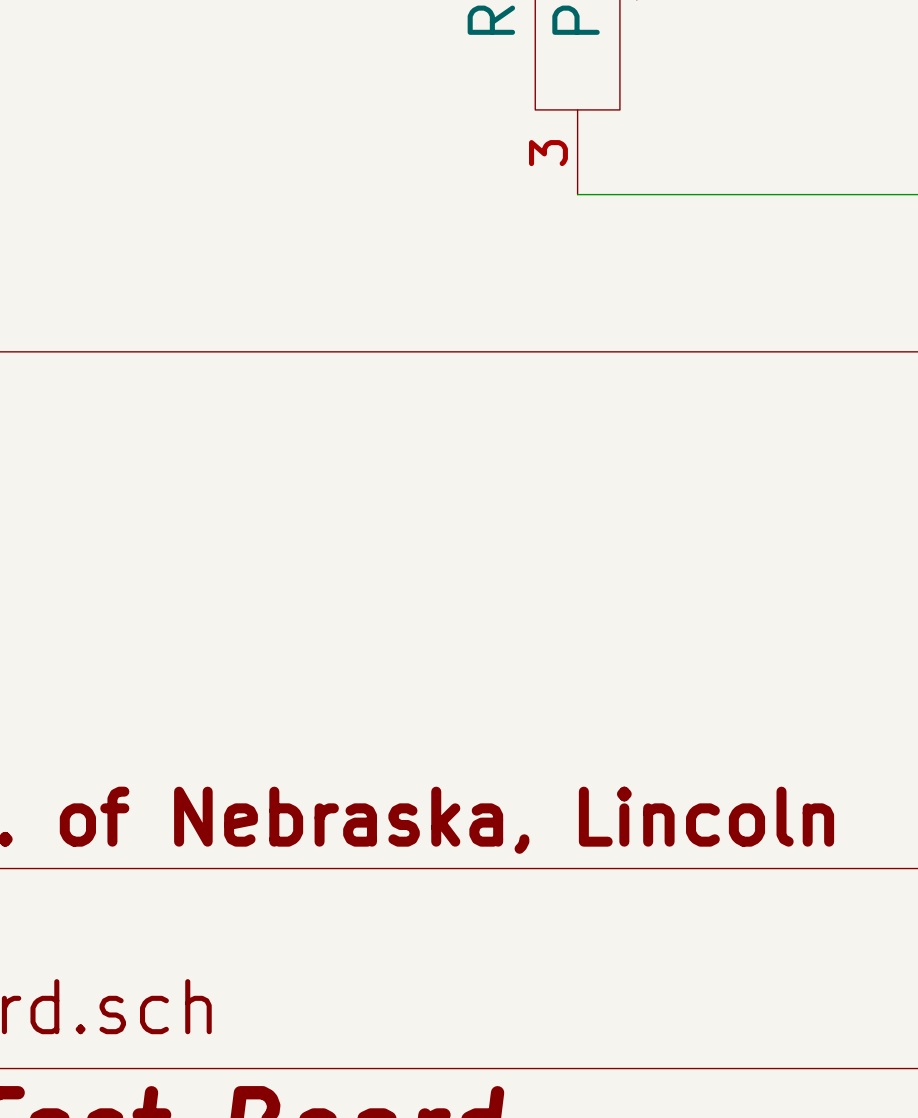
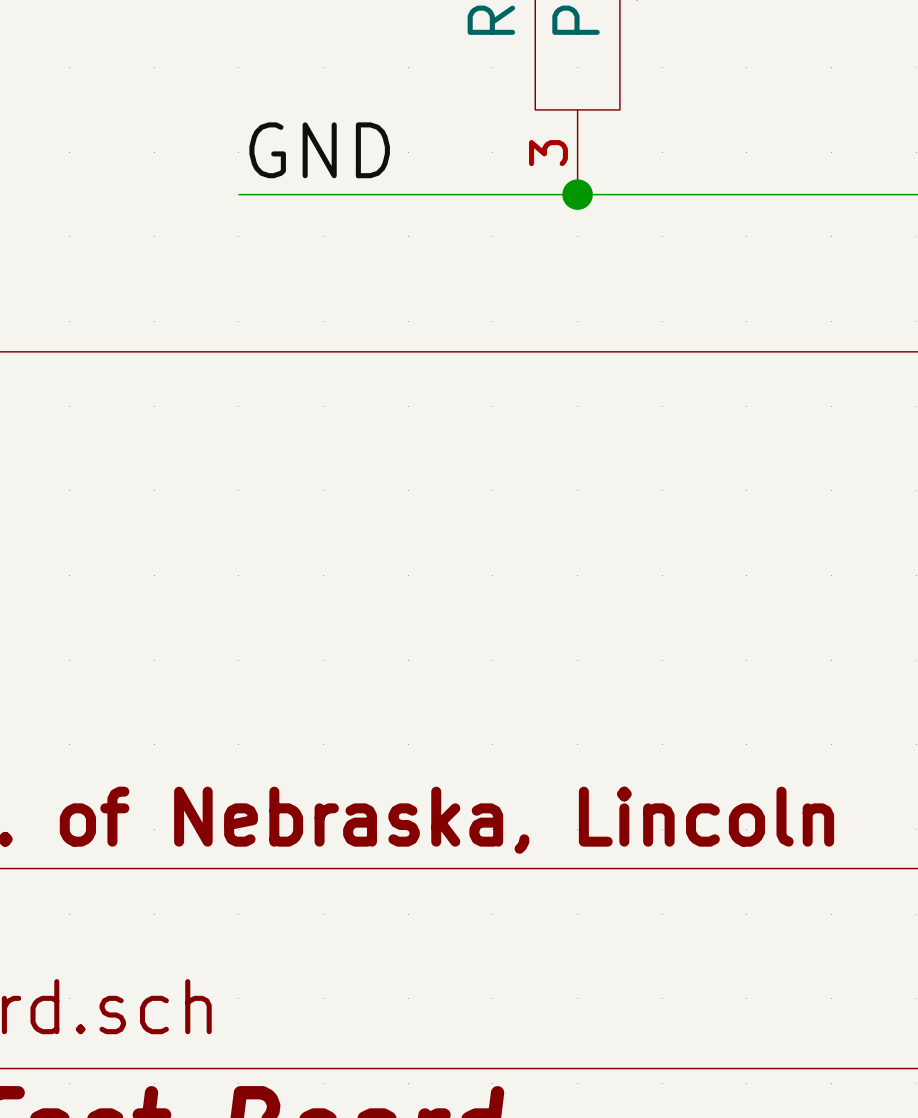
label: none -> GND (319, 150)
wire: none -> (238, 194) (577, 194)
junction: none -> (577, 194)

